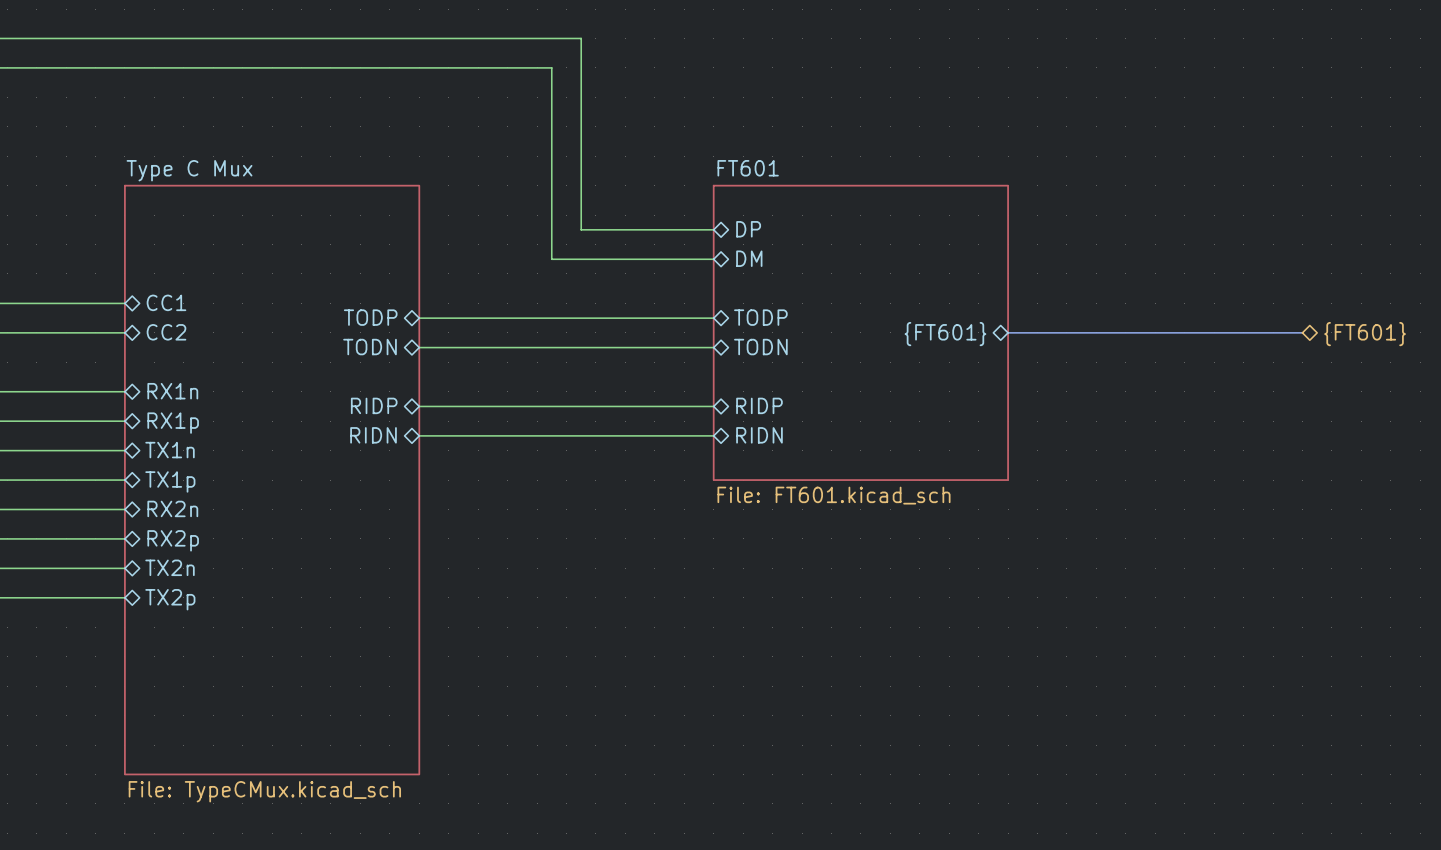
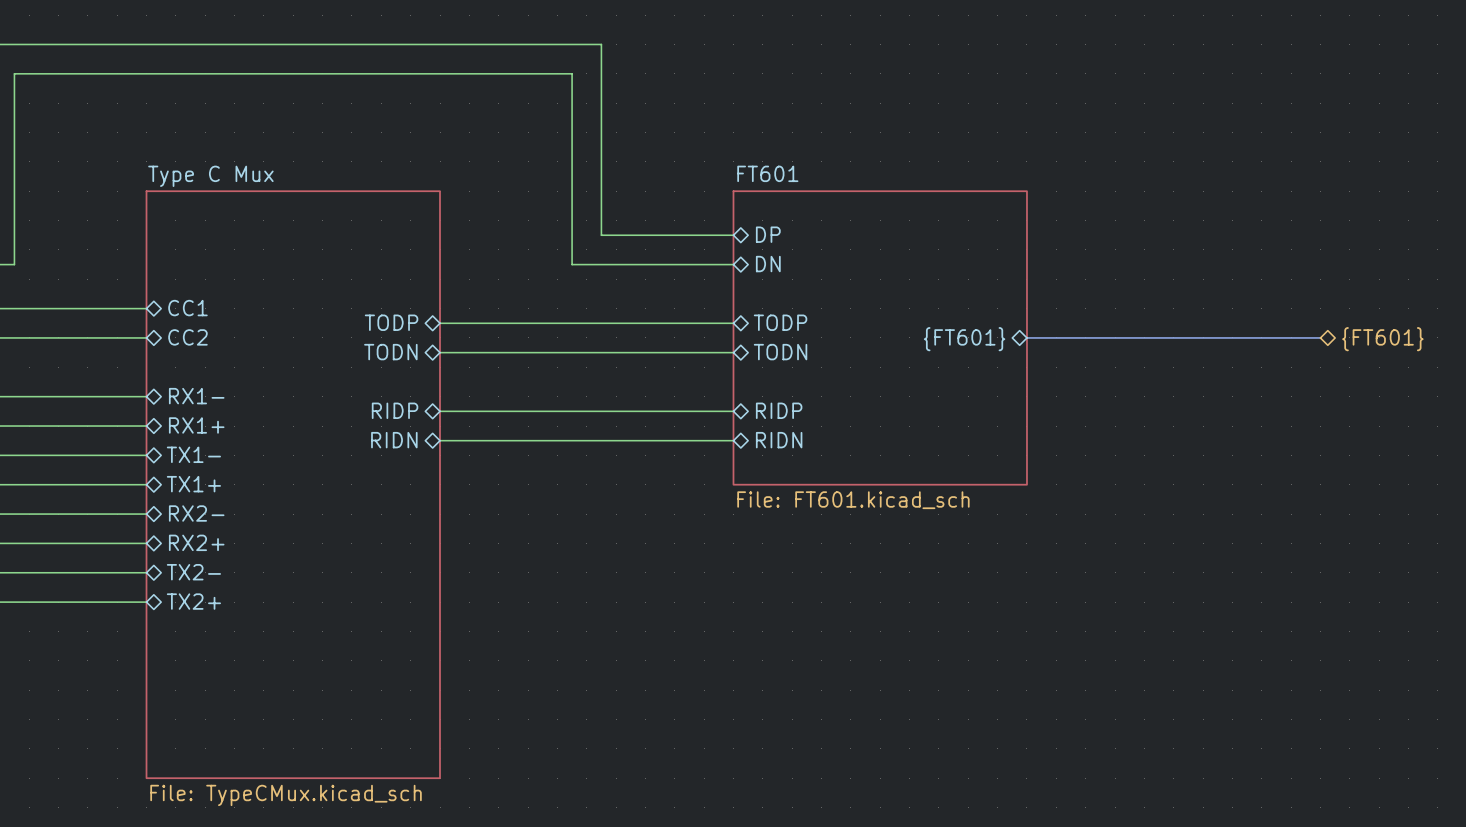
sheet pin: DM (749, 258) -> DN (768, 264)
sheet pin: RX1n (172, 391) -> RX1- (196, 396)
sheet pin: RX1p (173, 423) -> RX1+ (196, 425)
sheet pin: TX1n (170, 450) -> TX1- (193, 454)
sheet pin: TX1p (170, 481) -> TX1+ (193, 484)
sheet pin: RX2n (172, 508) -> RX2- (196, 513)
sheet pin: RX2p (173, 540) -> RX2+ (196, 542)
sheet pin: TX2n (170, 567) -> TX2- (193, 572)
sheet pin: TX2p (170, 599) -> TX2+ (193, 601)

